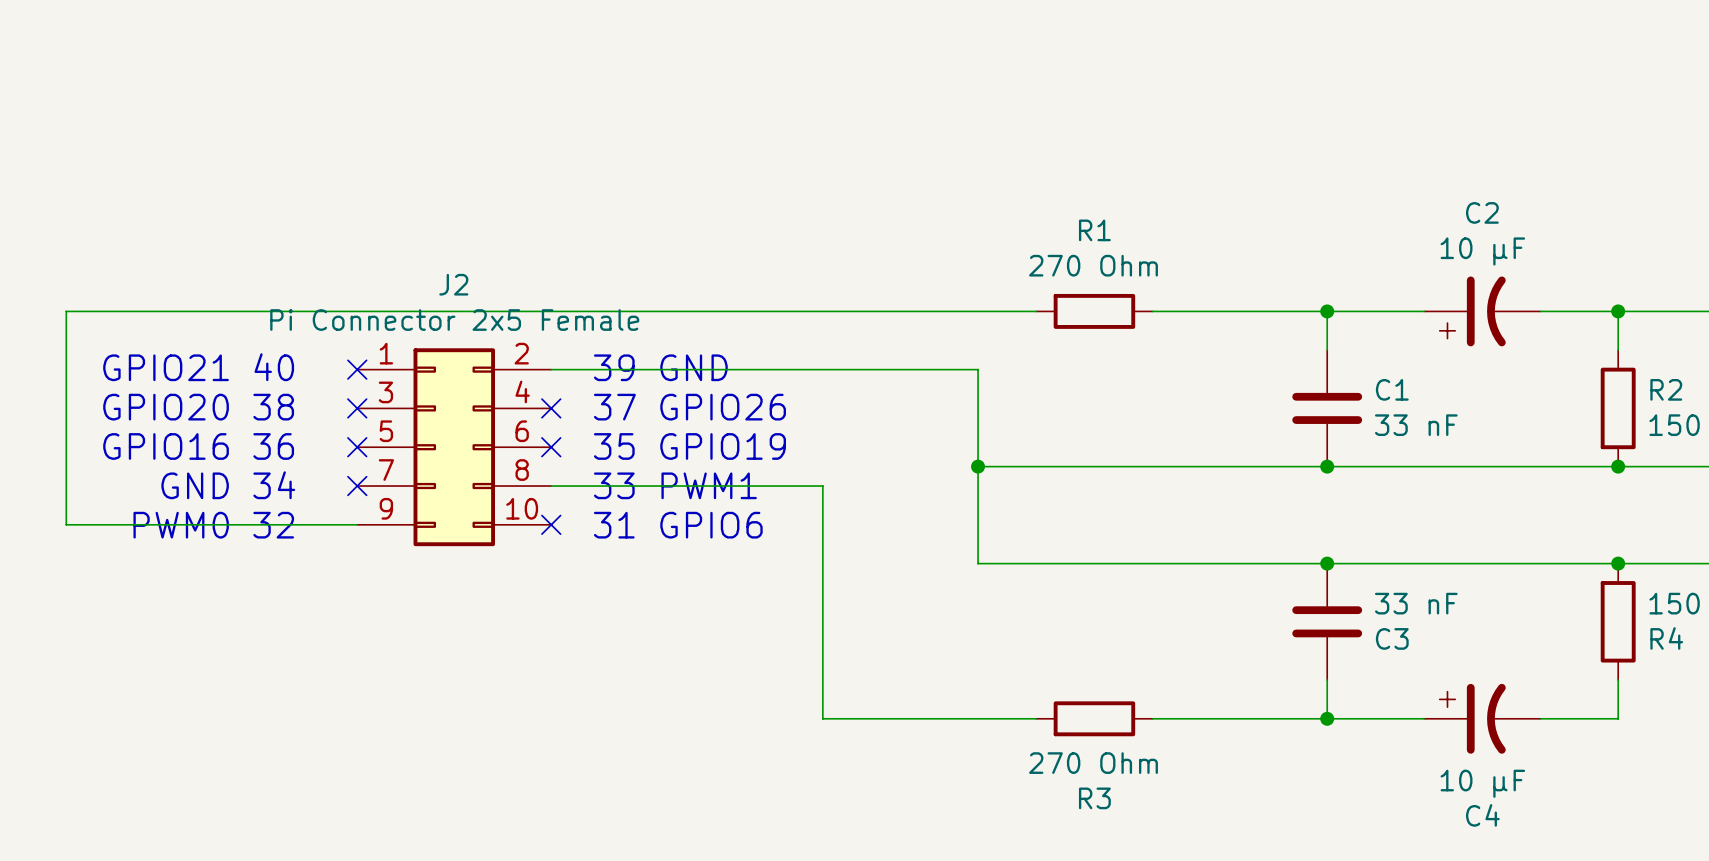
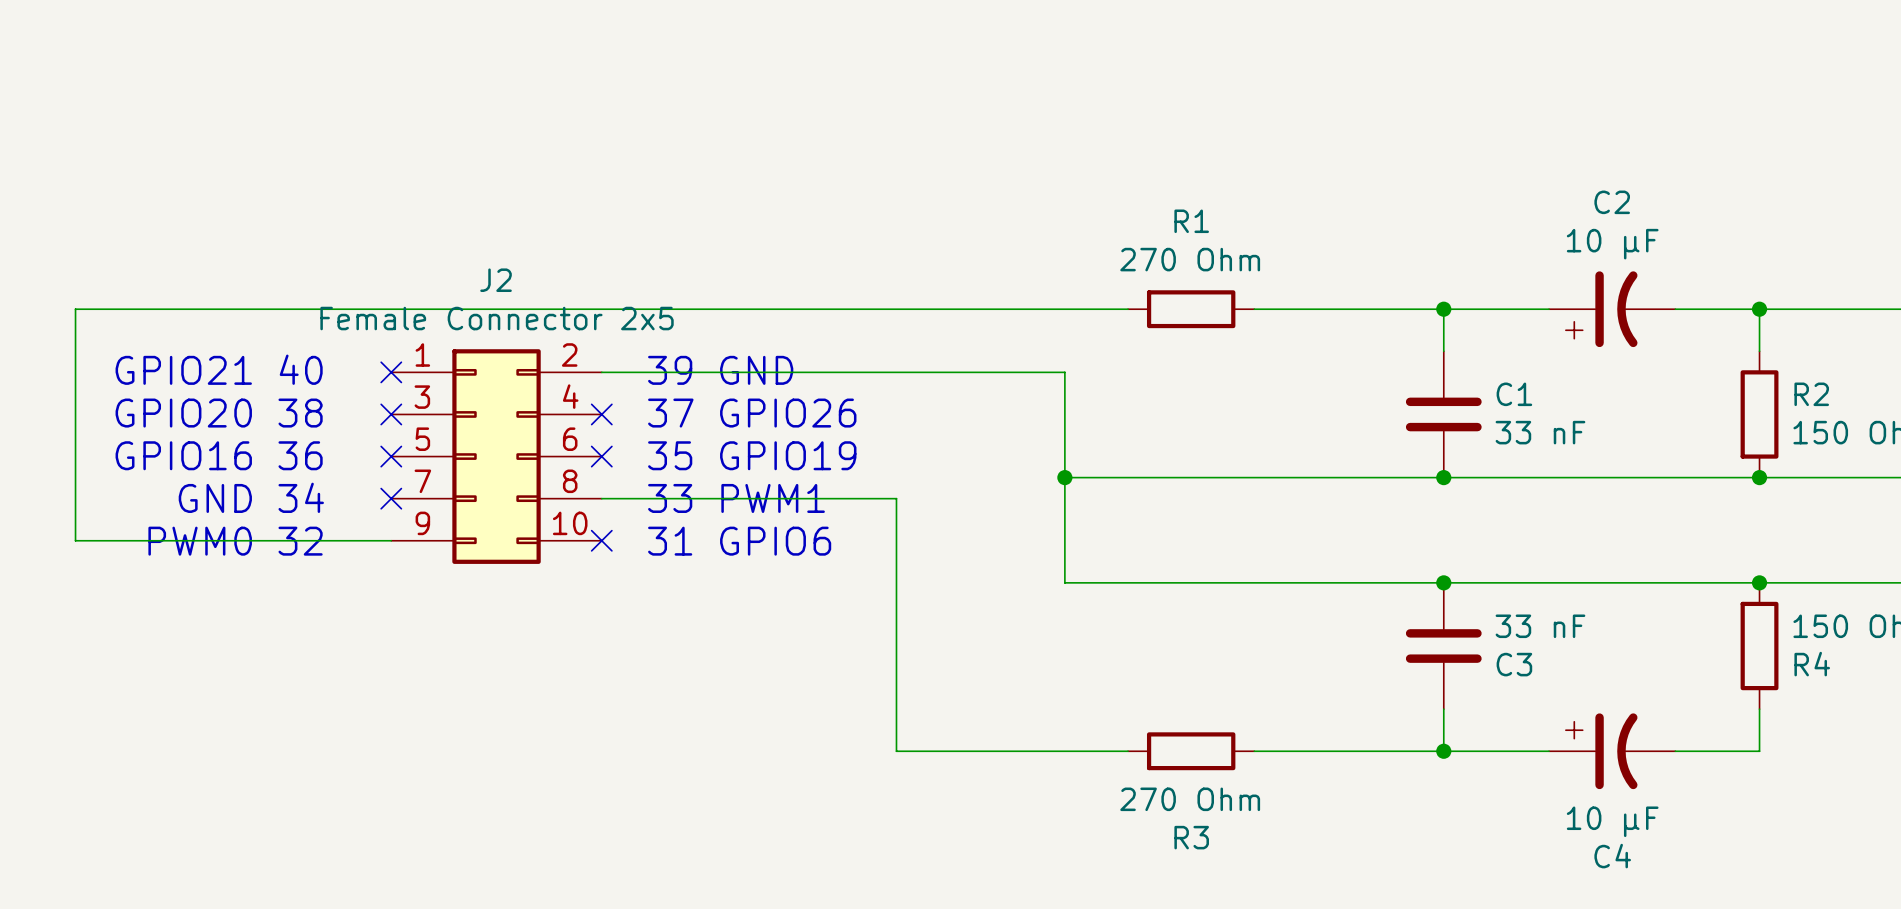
J2 value: Pi Connector 2x5 Female (454, 320) -> Female Connector 2x5 (497, 318)

